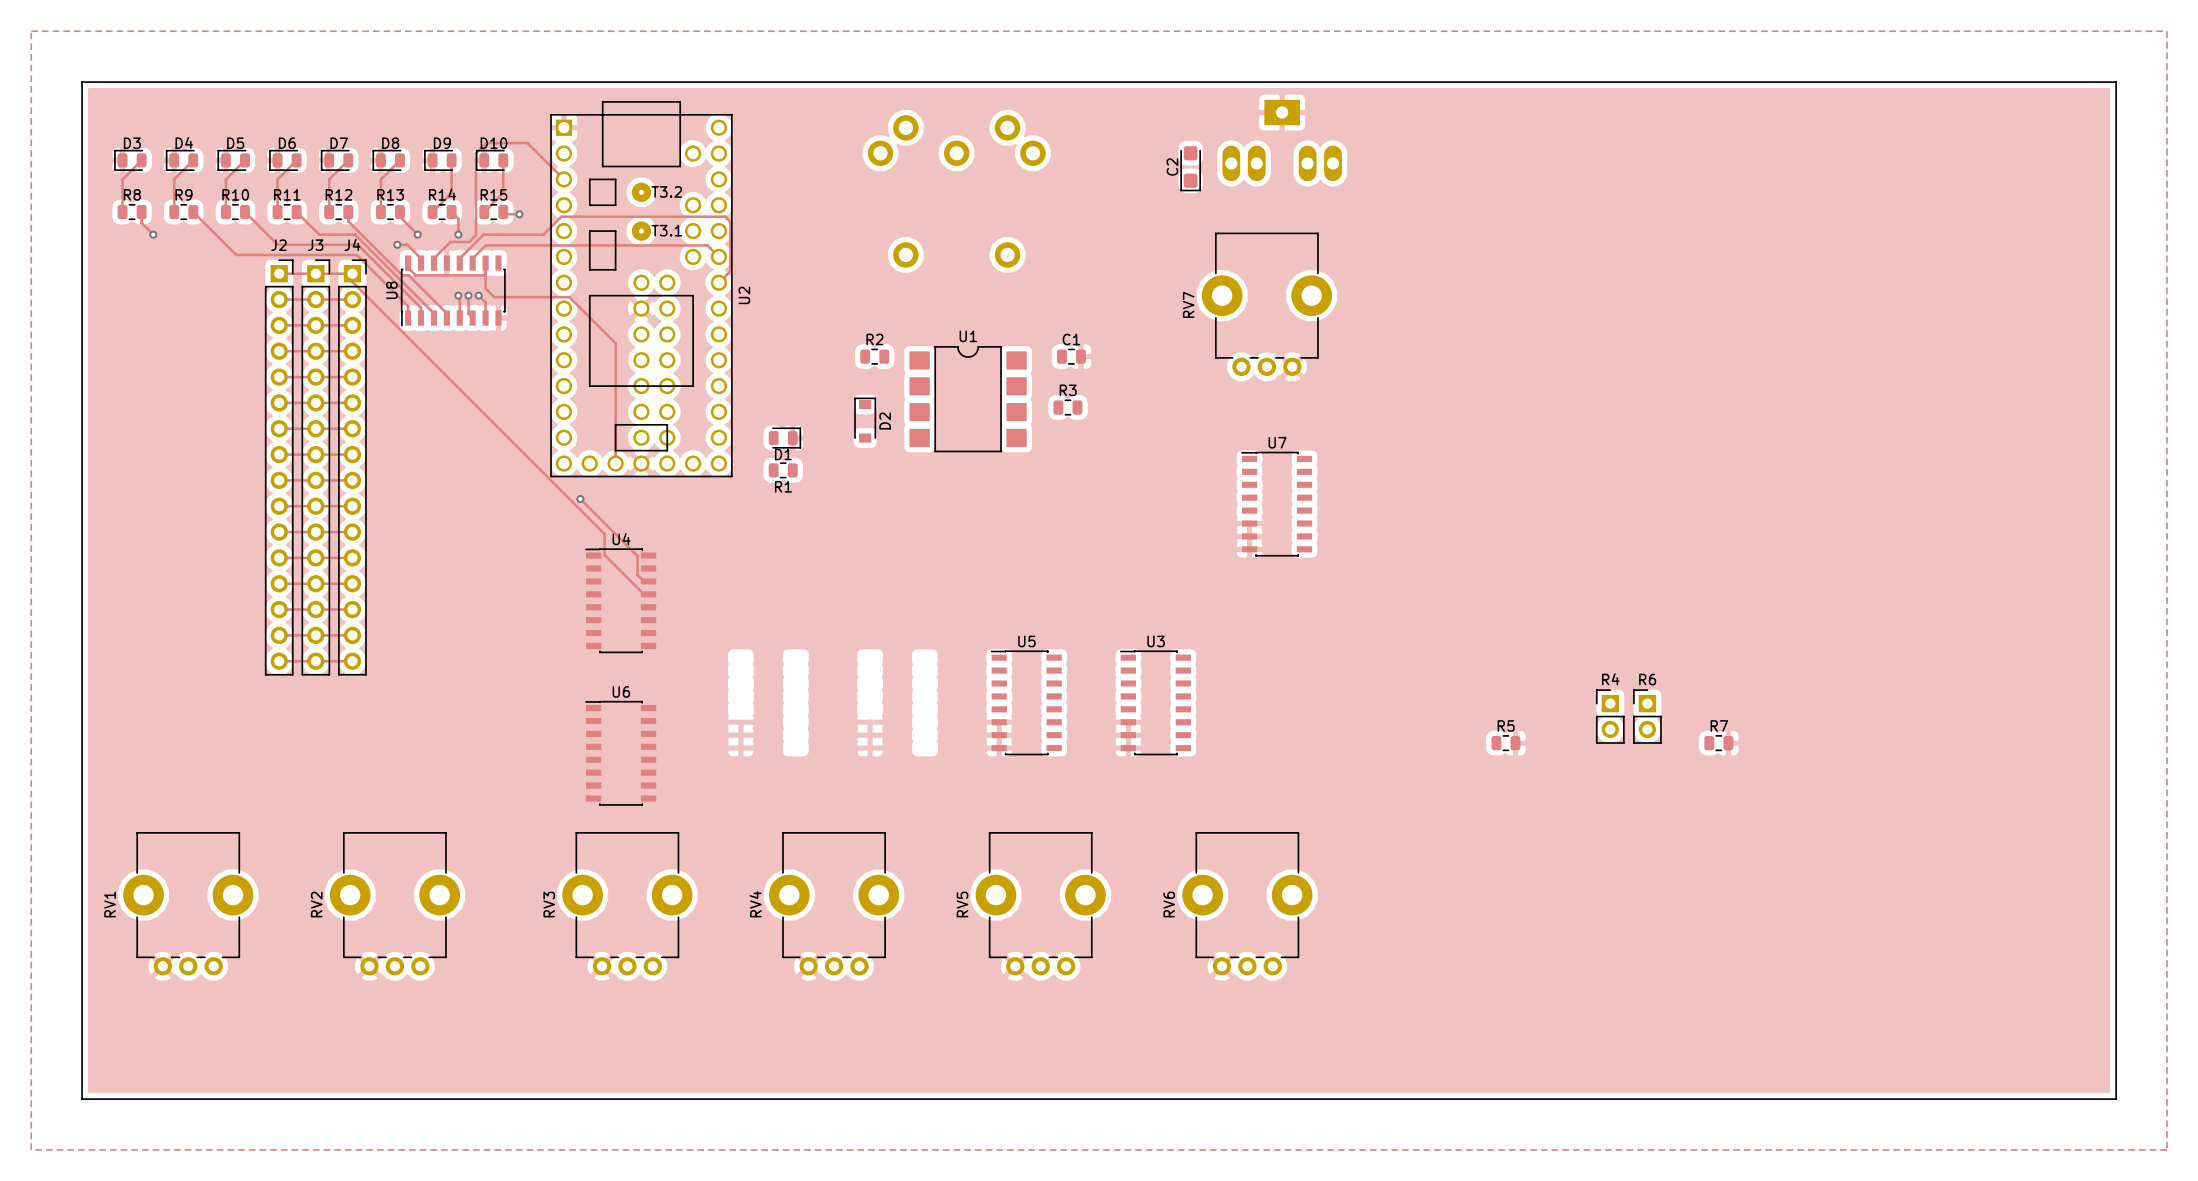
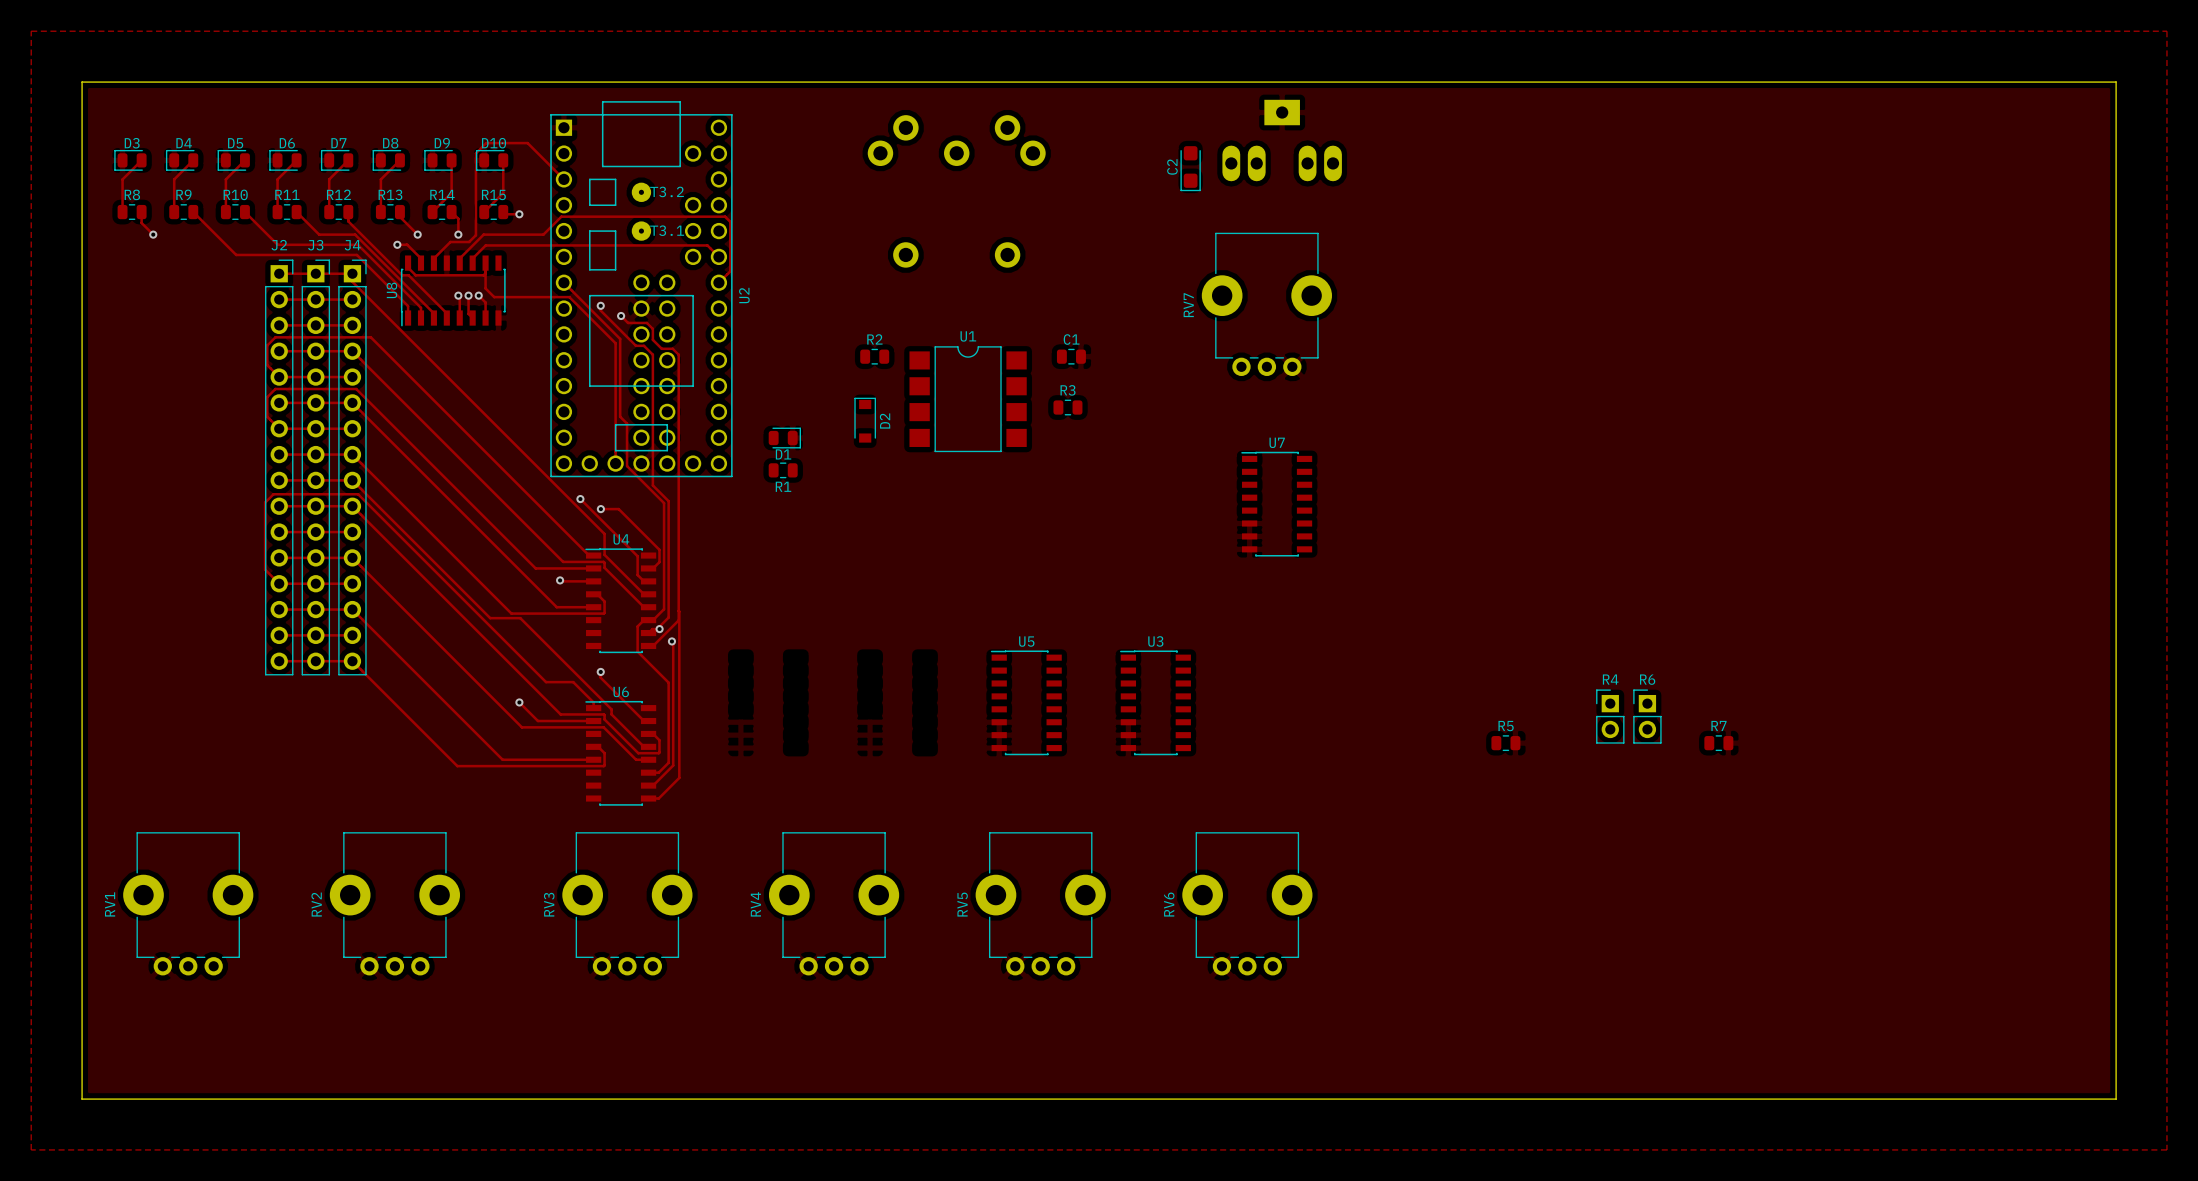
track: none -> (563, 282) (620, 338) (620, 416) (627, 423) (627, 466) (664, 503) (664, 609) (653, 620) (643, 620) (637, 626) (637, 651) (668, 682) (668, 762) (658, 772) (648, 772)
track: none -> (600, 305) (600, 310) (635, 345) (643, 345) (652, 354) (652, 485) (668, 501) (668, 617) (653, 633) (648, 633) (652, 629) (659, 629)
via: none -> (600, 305)
track: none -> (621, 315) (628, 322) (646, 322) (652, 328) (652, 339) (661, 348) (672, 348) (678, 354) (678, 620) (653, 645) (648, 645)
via: none -> (621, 315)
track: none -> (352, 351) (563, 561) (603, 561) (604, 567) (643, 607) (648, 607)
track: none -> (279, 377) (267, 365) (267, 345) (275, 337) (370, 337) (589, 555) (593, 555)
track: none -> (352, 402) (556, 607) (593, 607)
track: none -> (279, 428) (267, 416) (267, 397) (275, 389) (356, 389) (535, 568) (593, 568)
track: none -> (352, 454) (511, 613) (603, 613) (604, 601) (597, 594) (593, 594)
track: none -> (352, 480) (490, 618) (520, 618) (611, 709) (611, 714) (643, 746) (648, 746)
track: none -> (352, 506) (560, 714) (603, 714) (604, 719) (638, 753) (658, 753) (659, 740) (653, 733) (648, 733)
track: none -> (600, 509) (618, 509) (659, 549) (659, 562) (653, 568) (648, 568)
via: none -> (600, 509)
track: none -> (352, 557) (521, 727) (603, 727) (636, 759) (648, 759)
track: none -> (560, 580) (593, 581)
via: none -> (560, 580)
track: none -> (279, 583) (265, 569) (265, 502) (273, 494) (358, 494) (546, 682) (573, 682) (593, 702) (593, 708)
track: none -> (352, 609) (502, 759) (593, 759)
track: none -> (678, 610) (679, 777) (658, 798) (648, 798)
via: none -> (659, 629)
track: none -> (671, 641) (673, 765) (653, 785) (648, 785)
via: none -> (671, 641)
track: none -> (352, 661) (457, 766) (603, 766) (604, 753) (598, 746) (593, 746)
track: none -> (600, 671) (600, 677) (643, 721) (648, 721)
via: none -> (600, 671)
track: none -> (519, 702) (537, 721) (593, 721)
via: none -> (519, 702)

